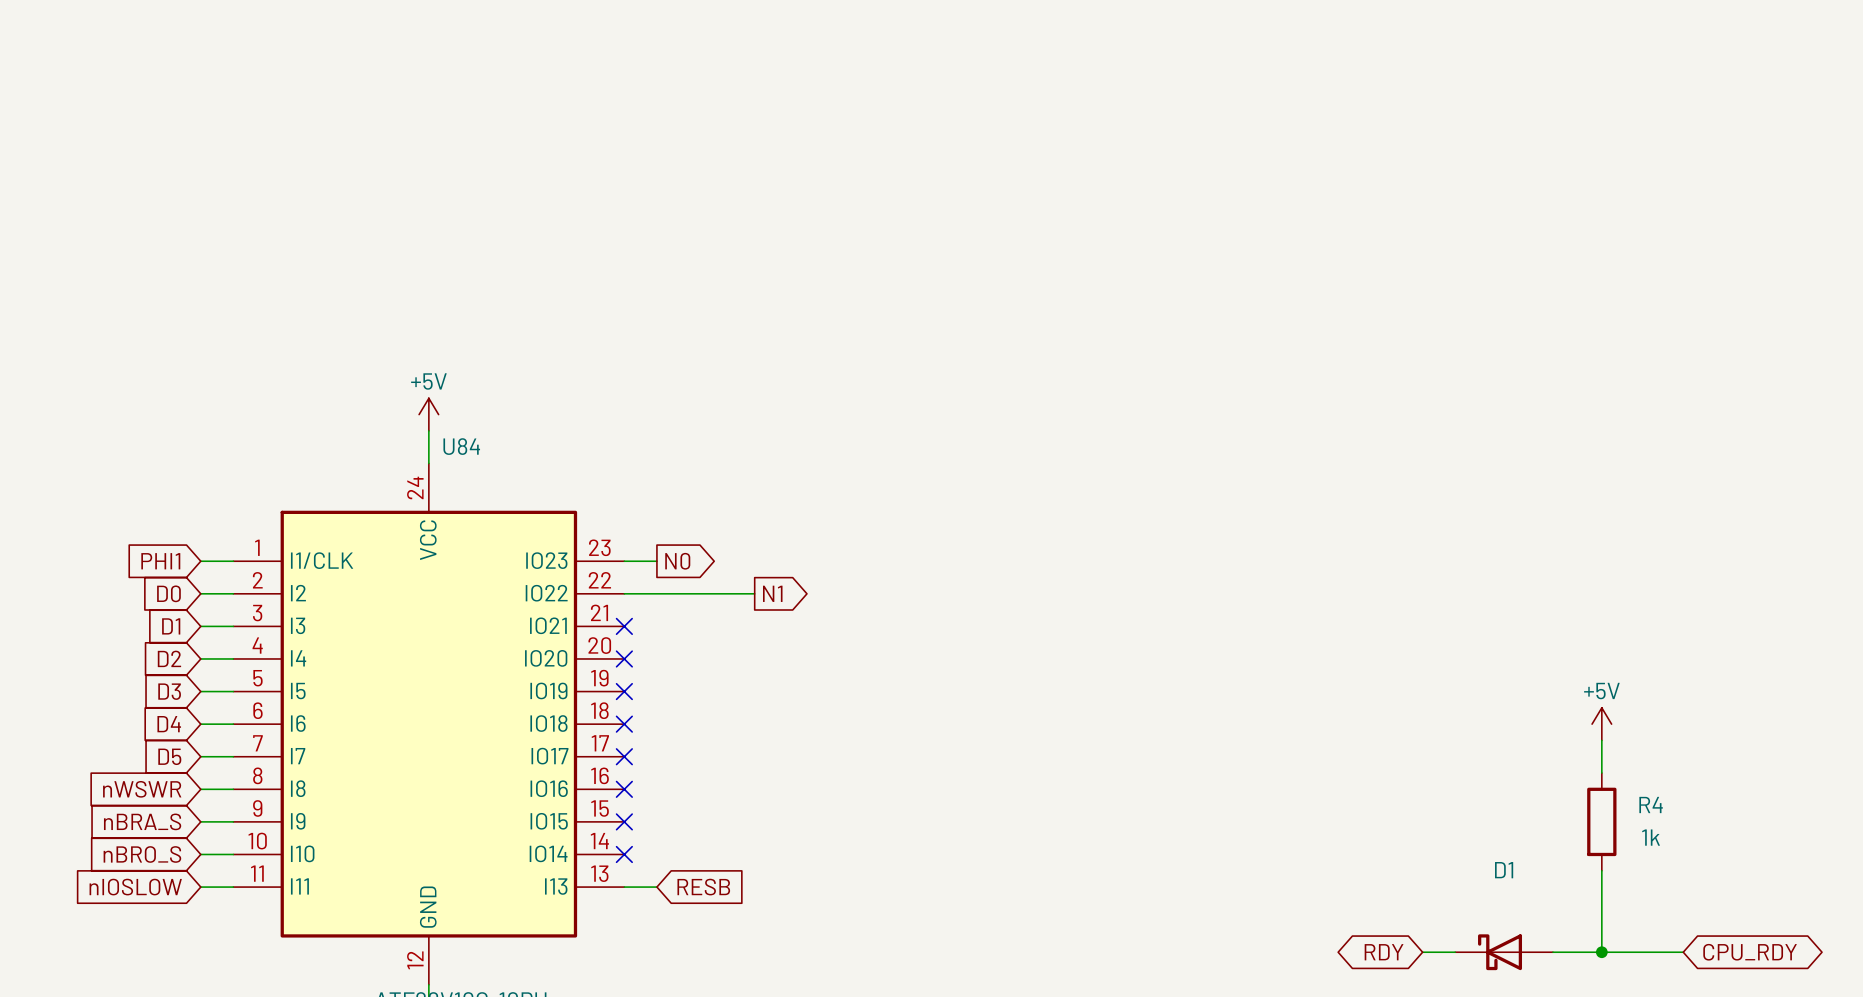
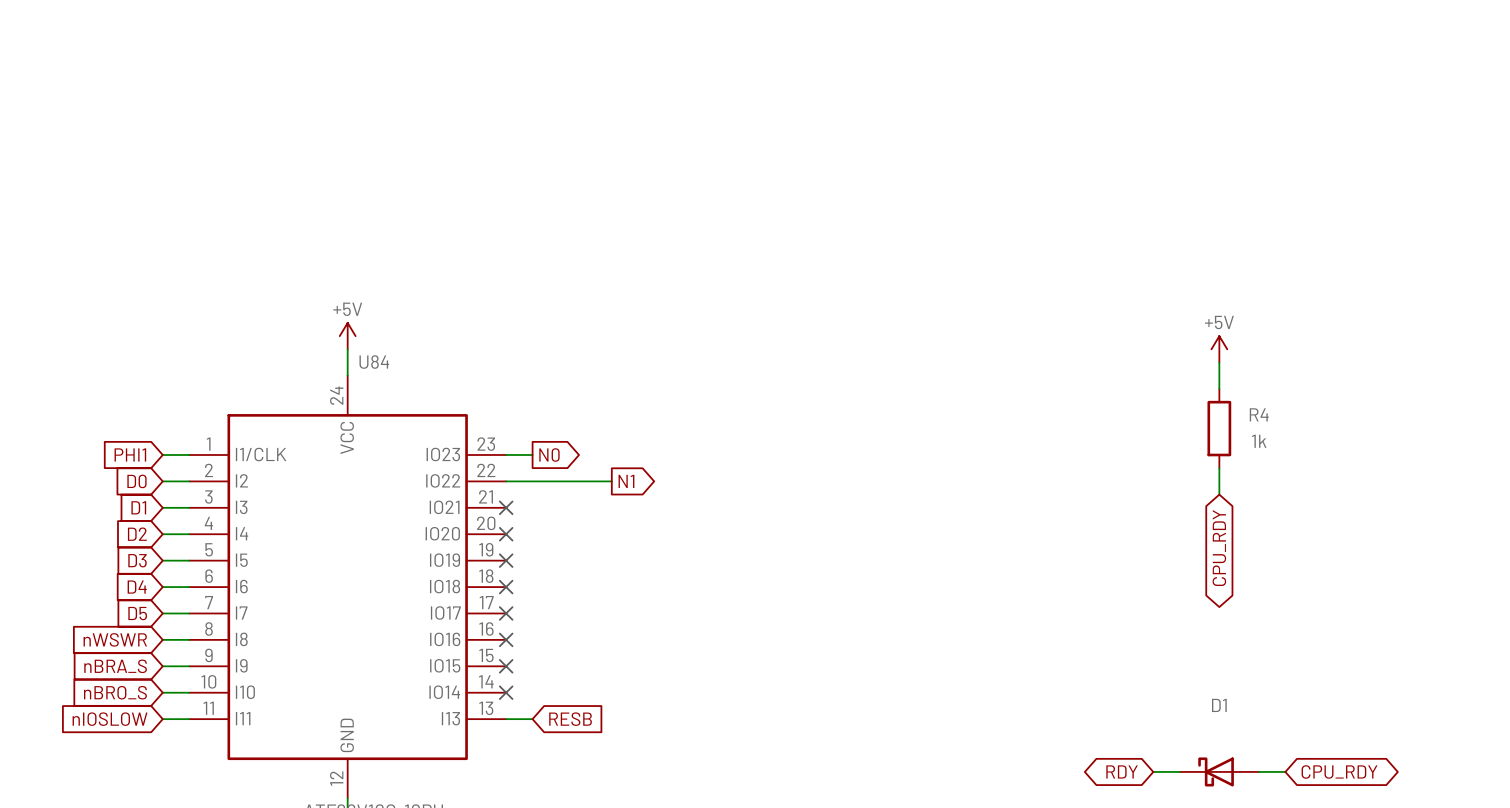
wire: none -> (1219, 362) (1219, 388)
global label: none -> CPU_RDY (1219, 548)
power symbol position: +5V (1601, 724) -> +5V (1219, 349)
wire: (1601, 740) (1601, 773) -> (1219, 468) (1219, 494)
R4 position: (1601, 821) -> (1219, 428)
wire: (1601, 870) (1601, 952) -> none
wire: (1585, 952) (1683, 952) -> none
junction: (1601, 952) -> none
global label position: CPU_RDY (1750, 952) -> CPU_RDY (1339, 771)

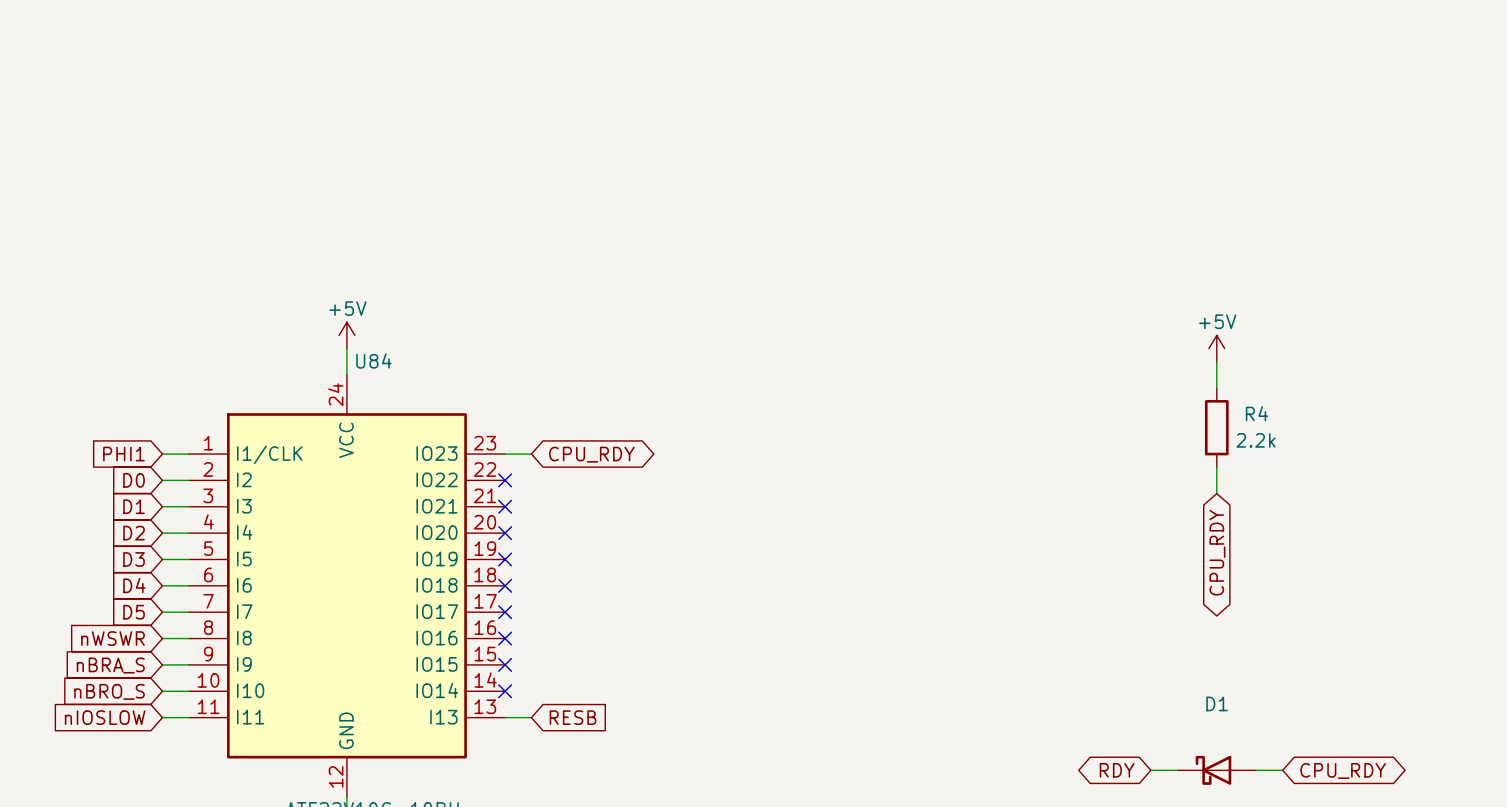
R4 value: 1k (1259, 441) -> 2.2k (1256, 440)
global label shape: output (549, 455) -> bidirectional (591, 454)
global label: N0 (549, 455) -> CPU_RDY (591, 454)
wire: (506, 481) (611, 481) -> none
no-connect mark: none -> (505, 480)
global label: N1 (626, 481) -> none

